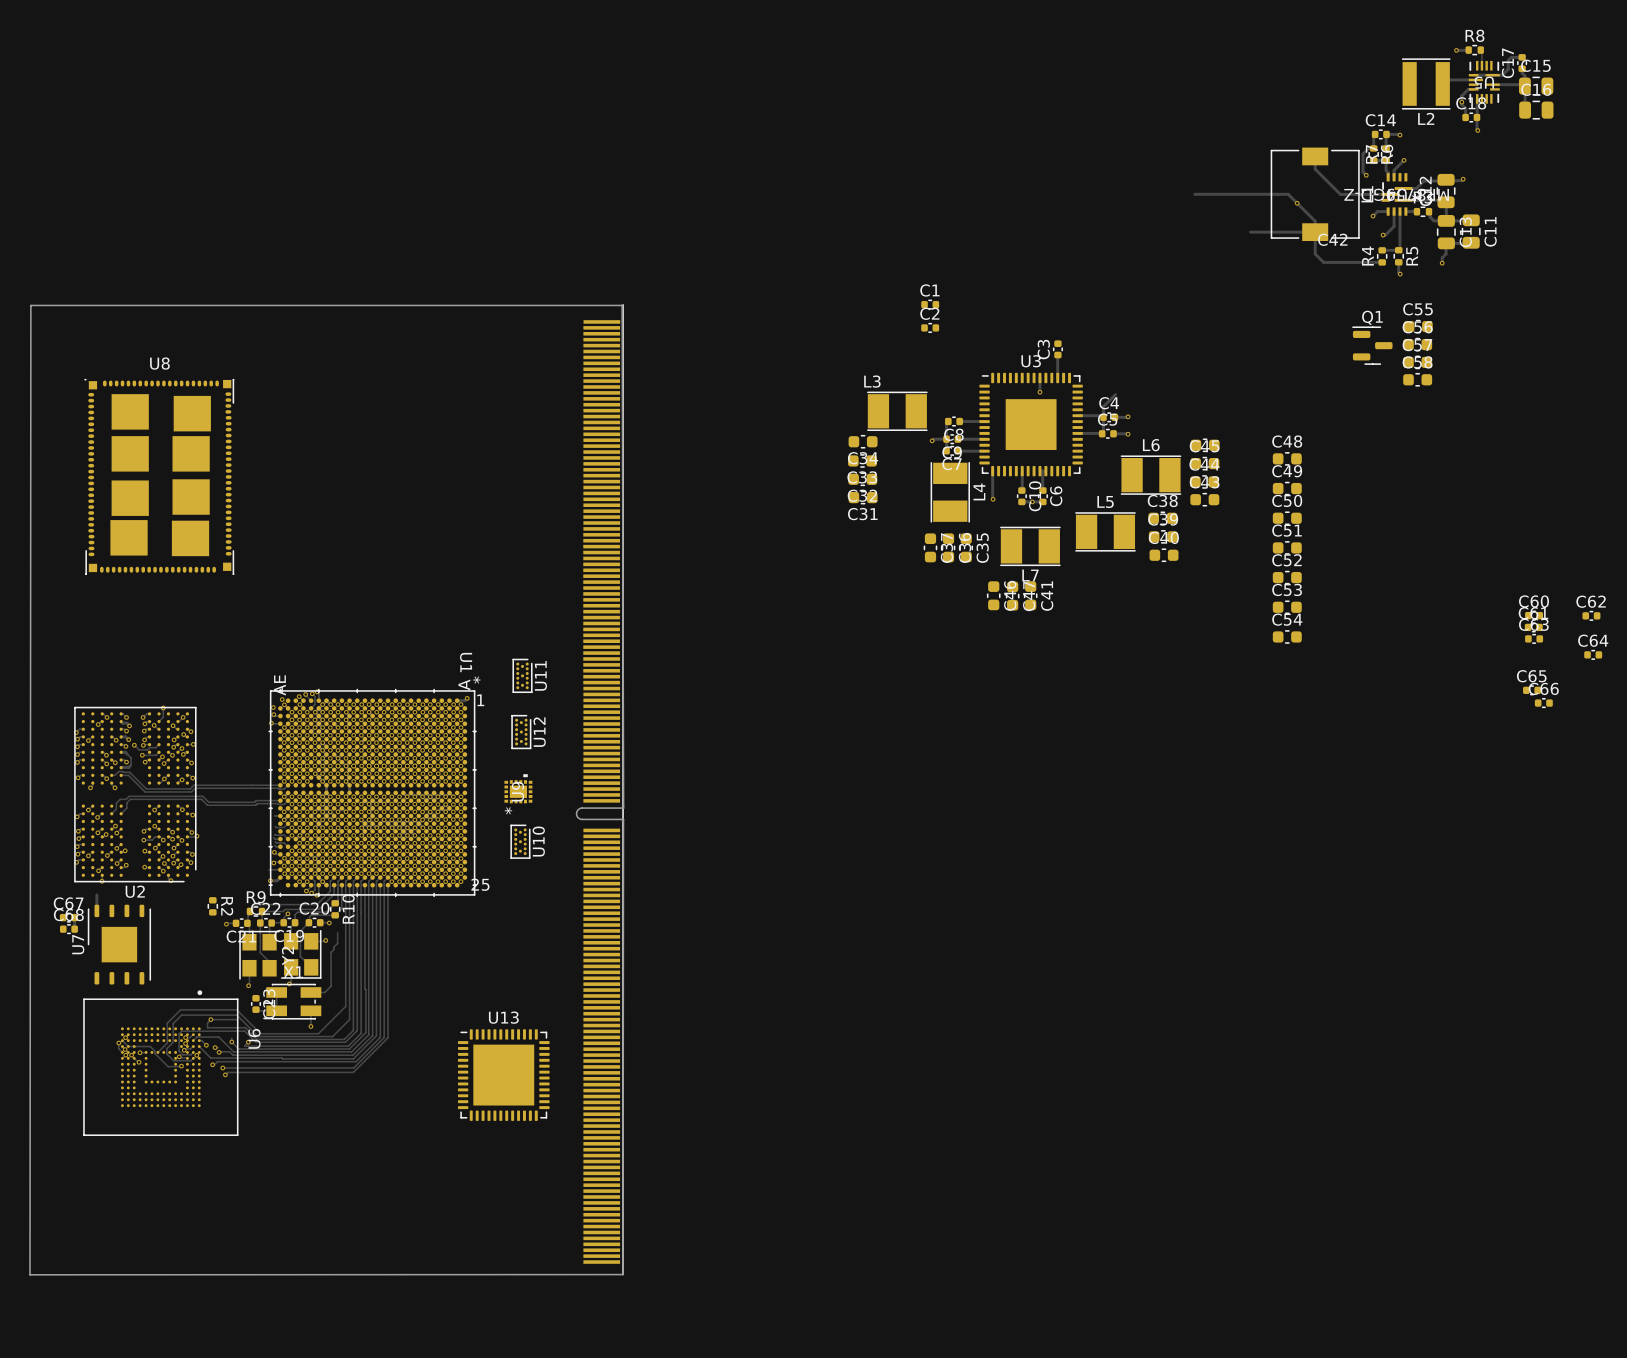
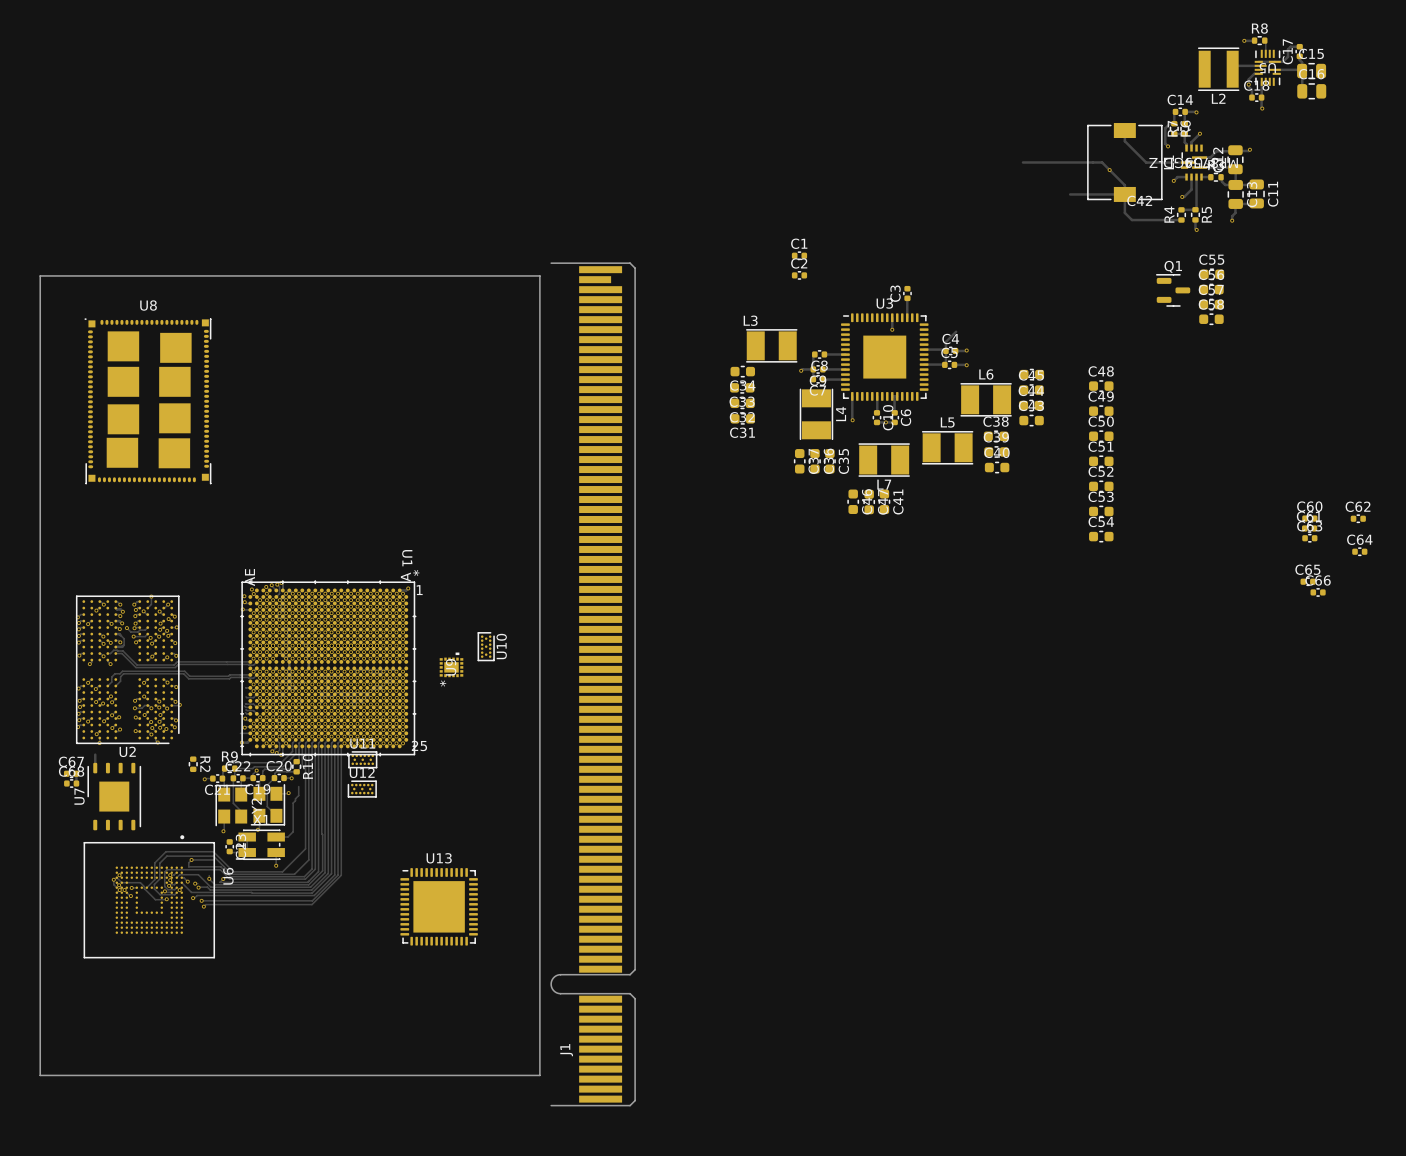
board edge: (30, 305) (30, 1274) (623, 1274) (623, 819) (581, 819) (576, 813) (581, 808) (623, 808) (622, 305) (30, 305) -> (40, 275) (40, 1075) (539, 1075) (539, 275) (40, 275)
U11 rotation: 0° (522, 675) -> 90° counterclockwise (362, 759)
U11 position: (522, 675) -> (362, 759)
U12 rotation: 0° (521, 732) -> 90° counterclockwise (362, 789)
U12 position: (521, 732) -> (362, 789)
part: (603, 789) -> none
J1: none -> (593, 684)
U10 position: (520, 841) -> (486, 646)

